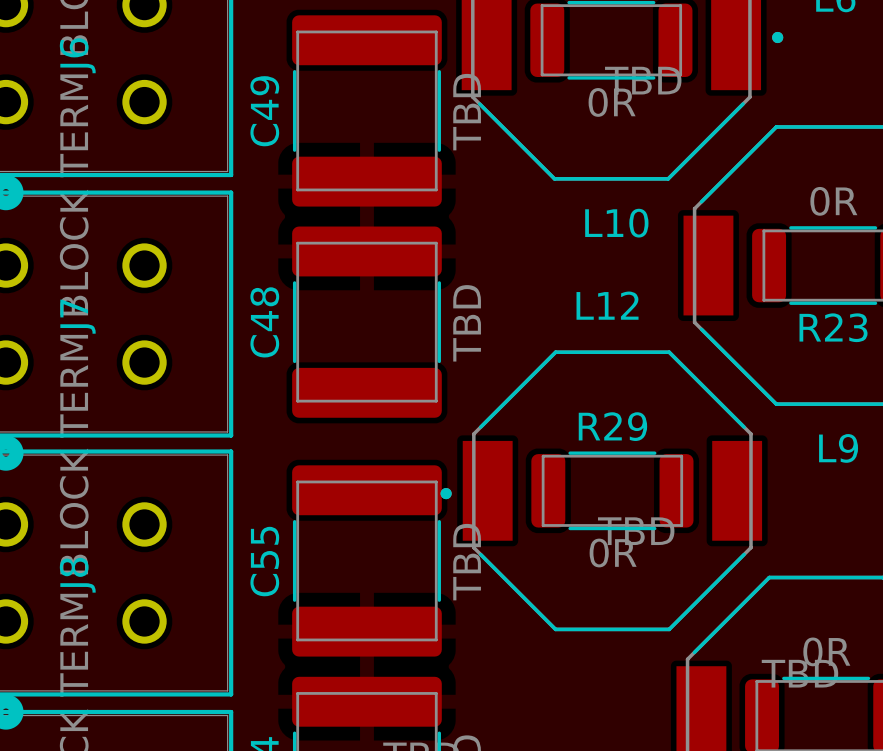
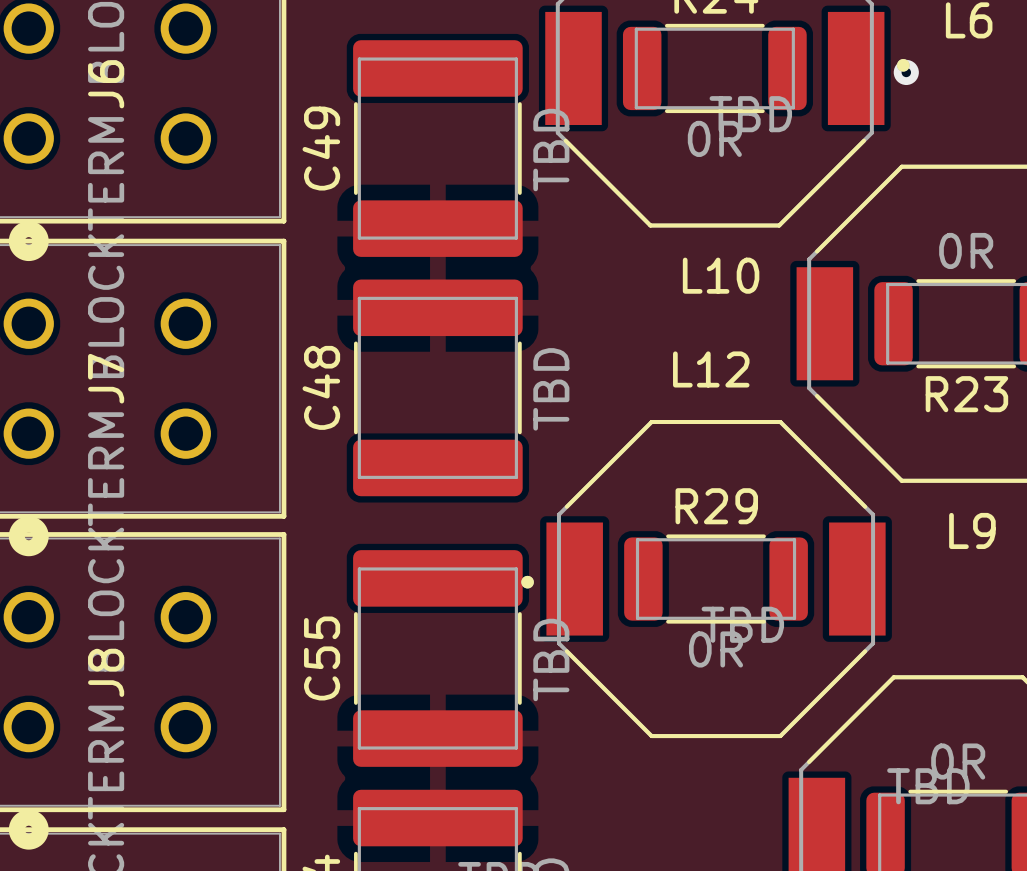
via: none -> (906, 72)

